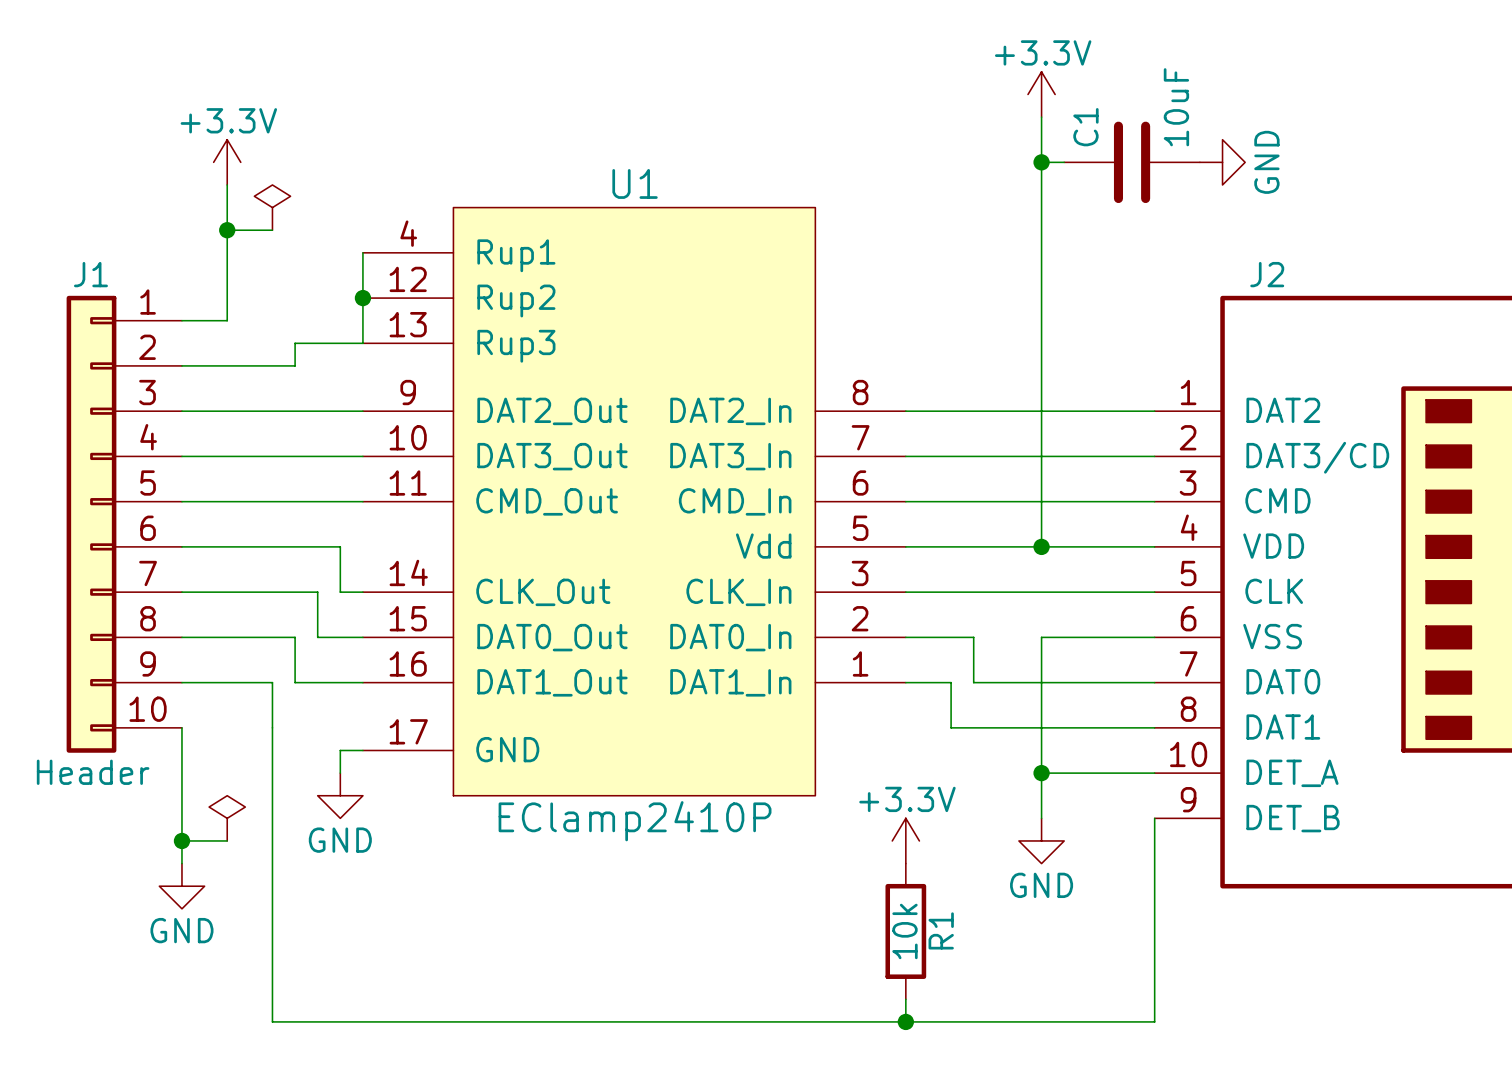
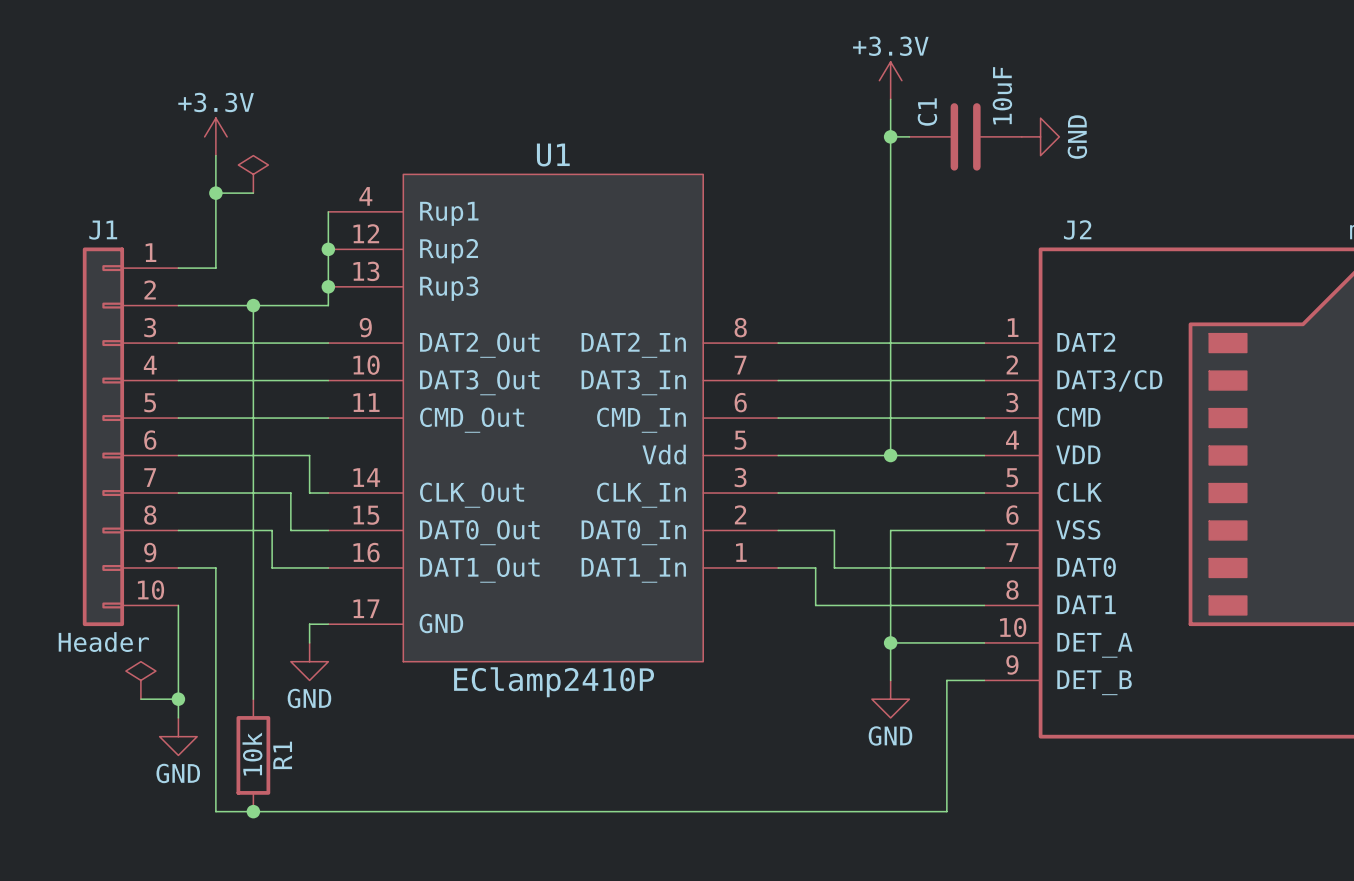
wire: (362, 343) (295, 343) (295, 365) -> (328, 286) (328, 305) (272, 305)
junction: none -> (328, 286)
junction: none -> (253, 305)
wire: (227, 682) (272, 682) -> (253, 305) (253, 567)
power symbol position: (227, 818) -> (140, 680)
wire: (1154, 818) (1154, 1021) (272, 1021) (272, 840) -> (984, 680) (946, 680) (946, 811) (215, 811) (215, 567)
wire: (181, 840) (227, 840) -> (178, 699) (140, 699)
power symbol: +3.3V (905, 840) -> none
R1 position: (905, 931) -> (253, 755)
junction: none -> (253, 811)
wire: (905, 999) (905, 1021) -> none
junction: (905, 1021) -> none

